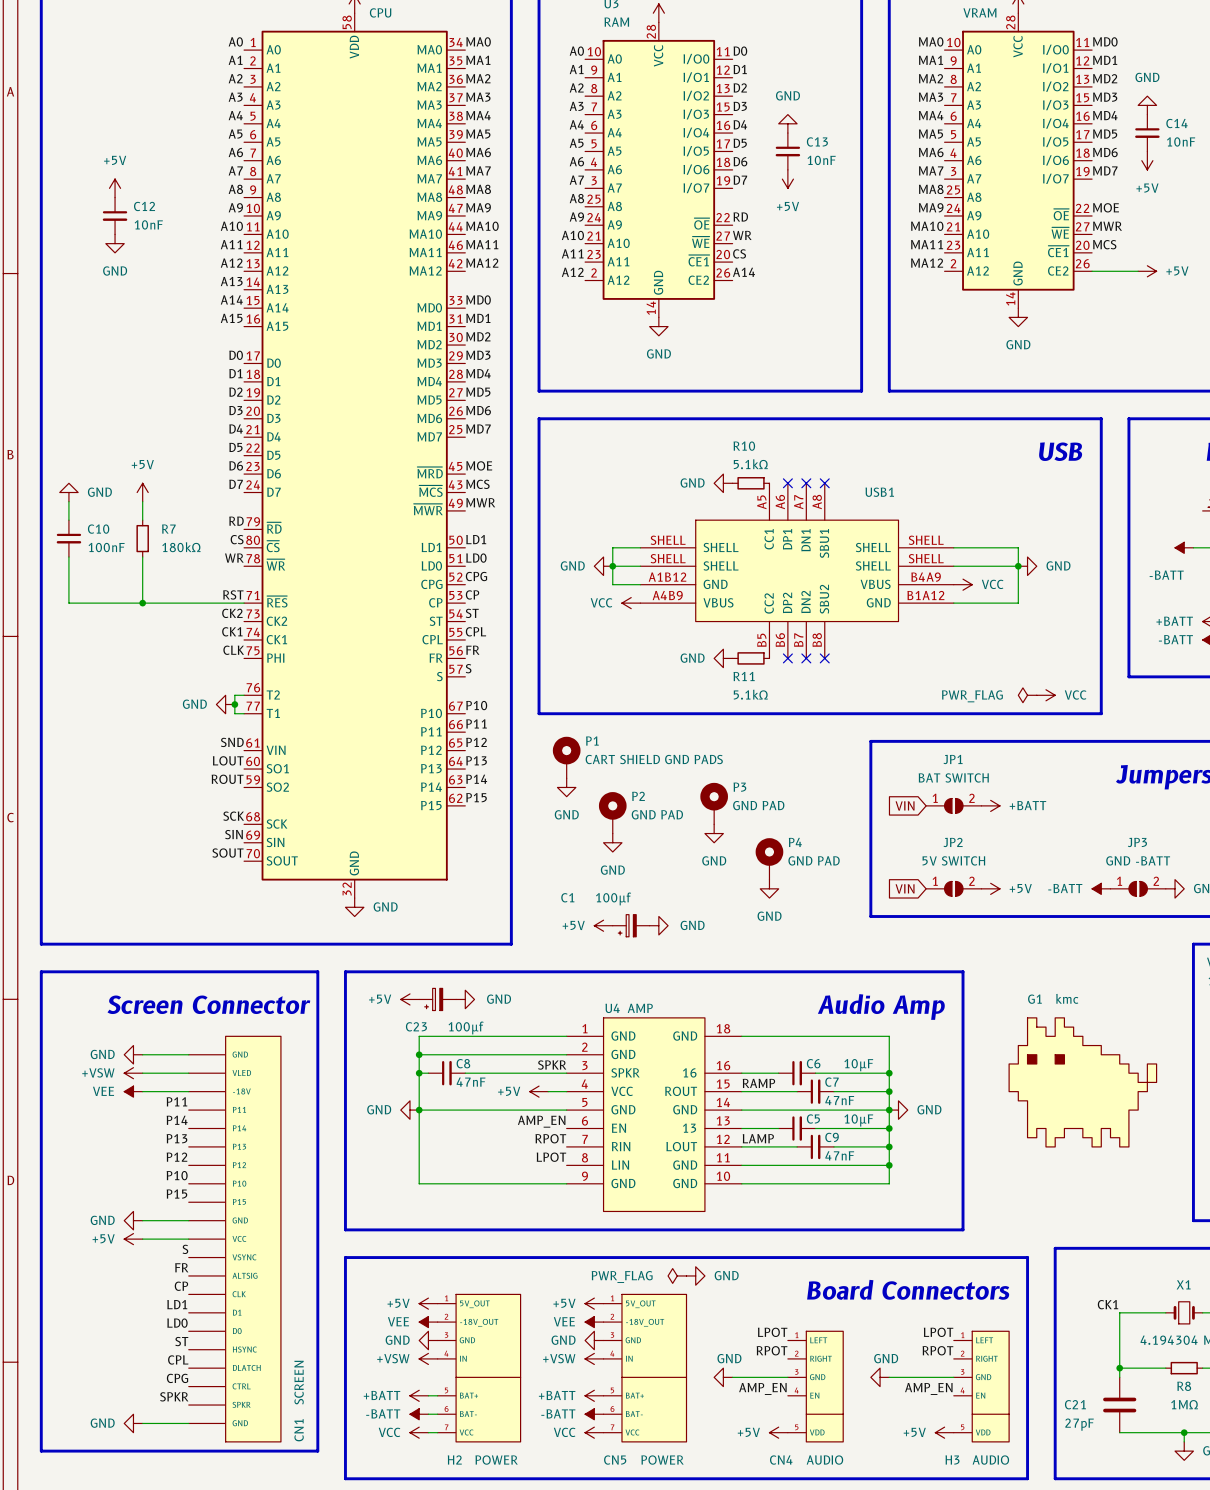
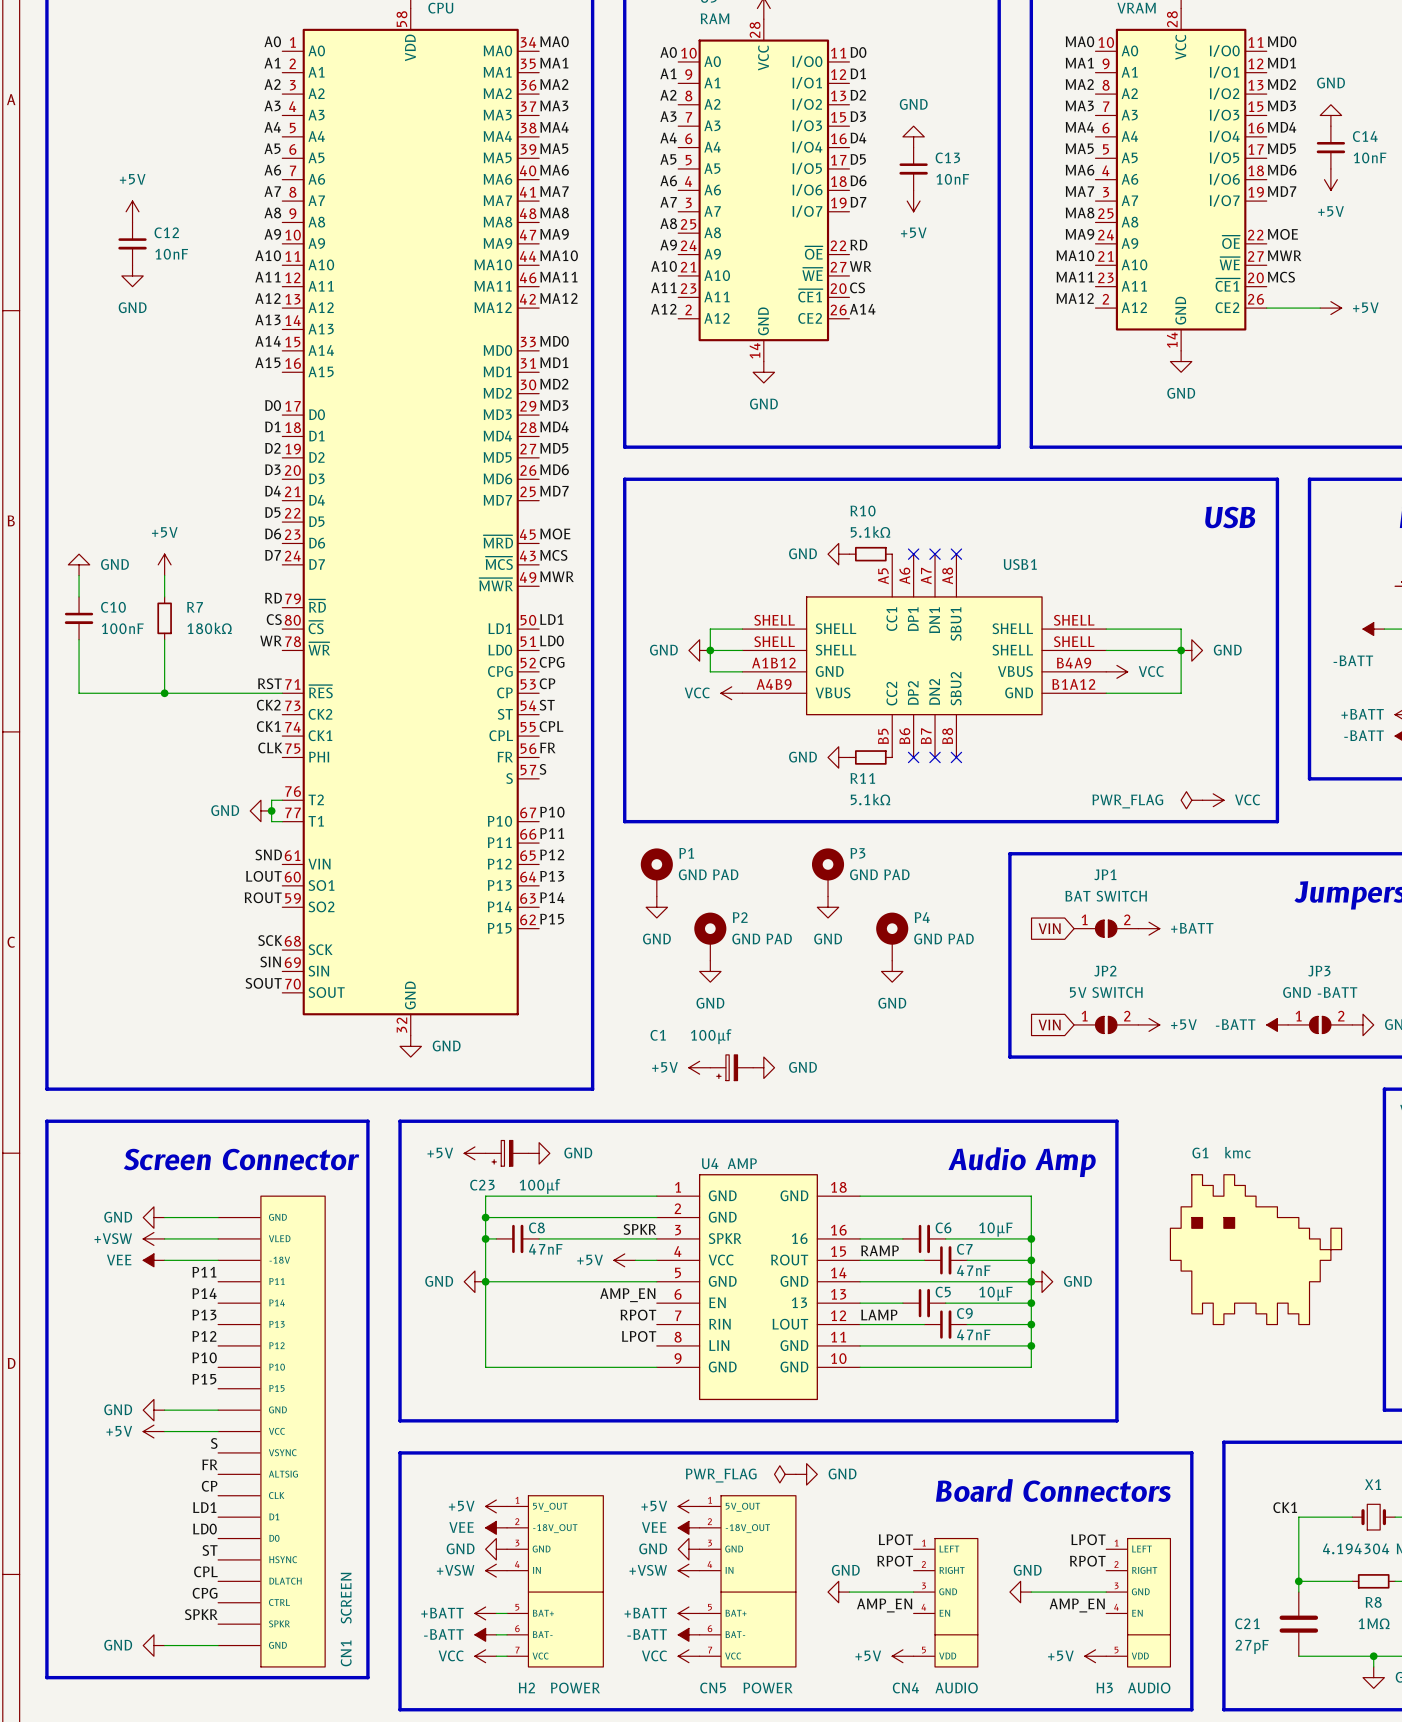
P1 value: CART SHIELD GND PADS (654, 759) -> GND PAD (708, 874)
power symbol: none -> GND (828, 907)
P3 position: (714, 803) -> (828, 872)
power symbol: GND (714, 833) -> none
power symbol: none -> GND (892, 971)
P4 position: (769, 858) -> (892, 936)
power symbol: GND (769, 888) -> none

